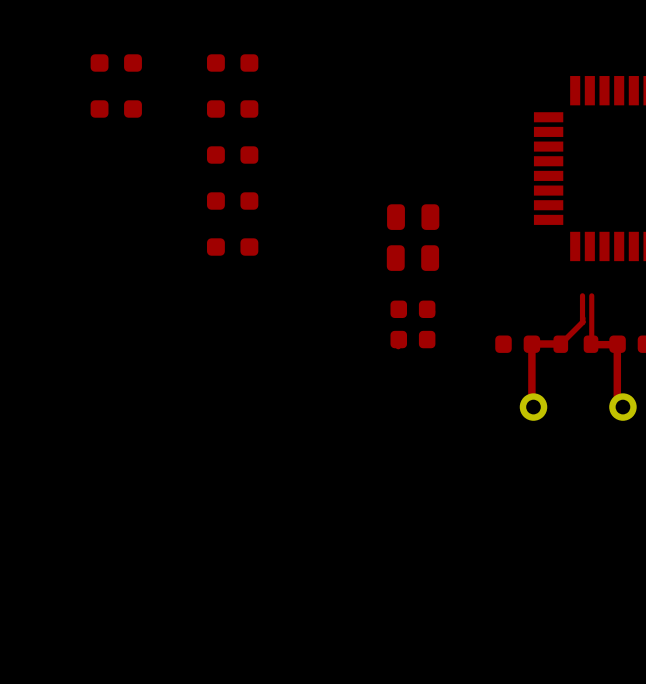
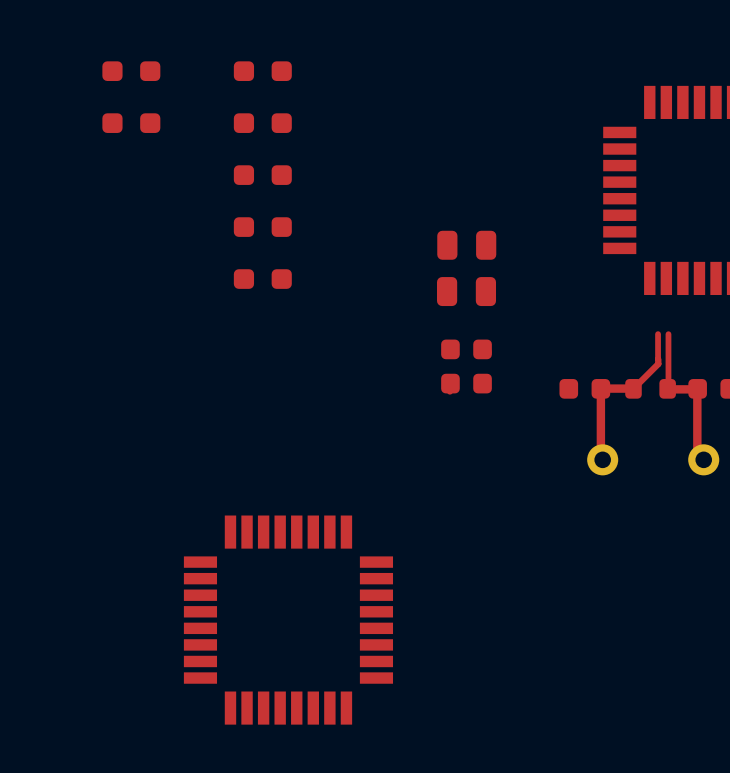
part: none -> (288, 620)

